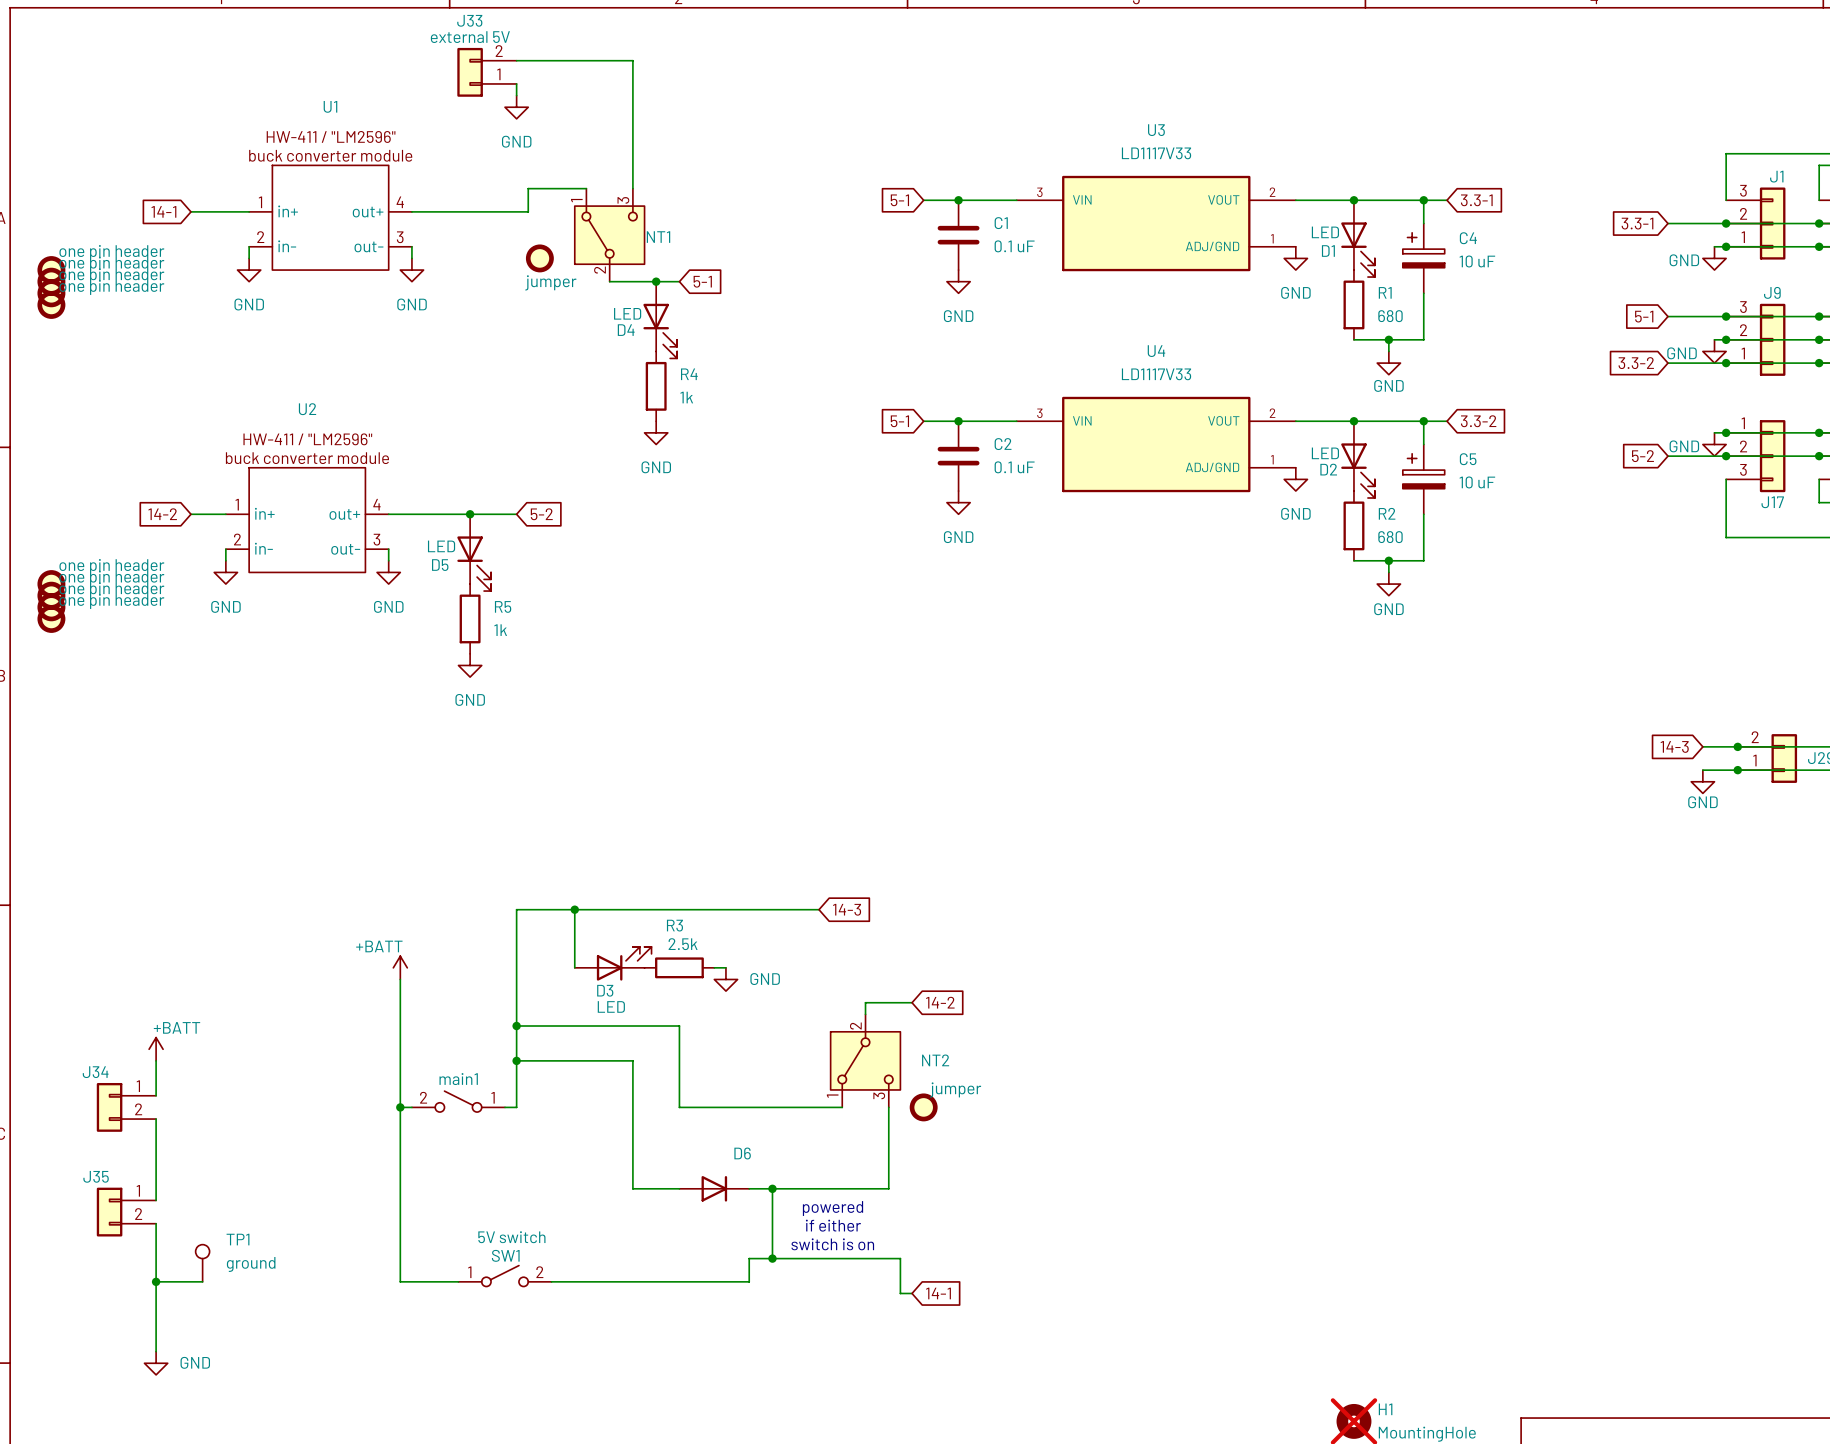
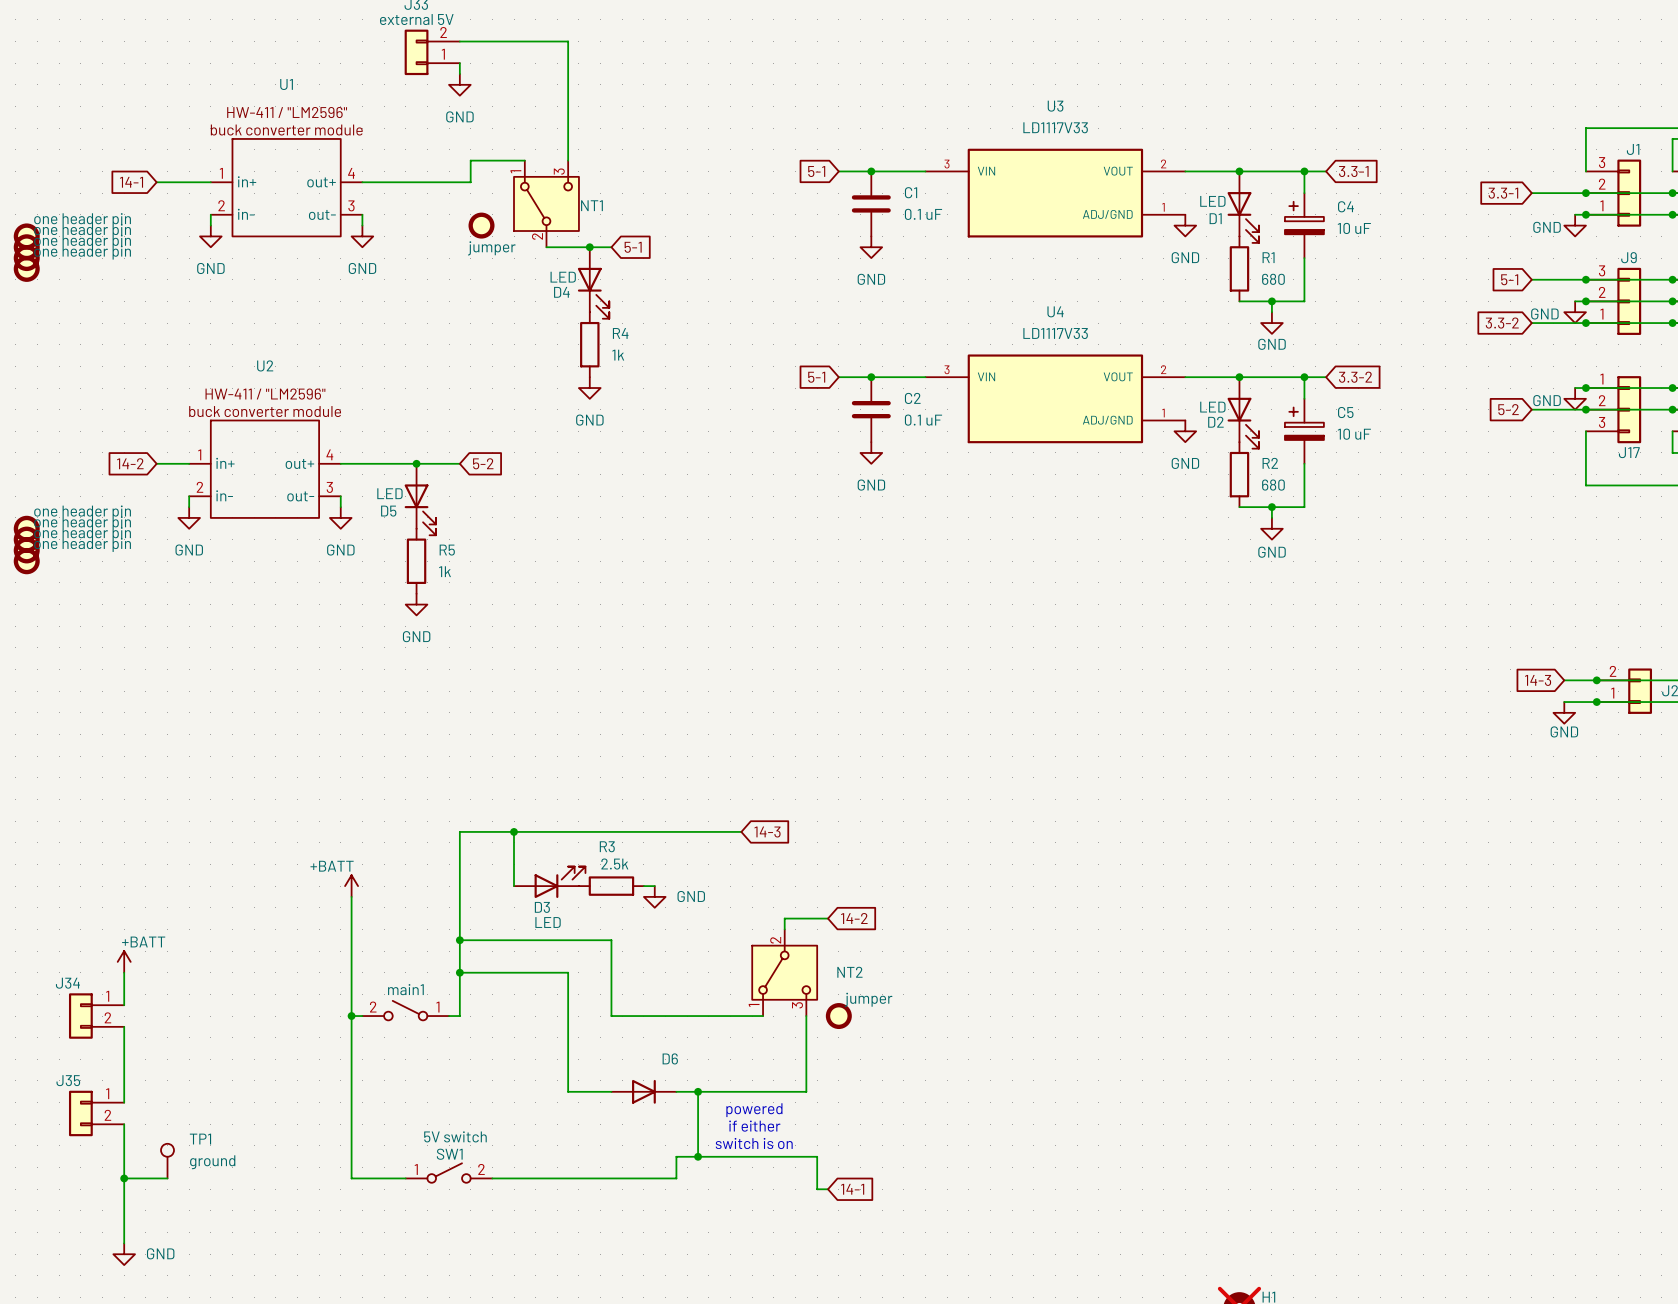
part value: one pin header (111, 252) -> one header pin (82, 220)
part value: one pin header (111, 264) -> one header pin (82, 230)
part value: one pin header (111, 275) -> one header pin (82, 241)
part value: one pin header (111, 287) -> one header pin (82, 252)
part value: one pin header (111, 566) -> one header pin (82, 512)
part value: one pin header (111, 578) -> one header pin (82, 523)
part value: one pin header (111, 589) -> one header pin (82, 534)
part value: one pin header (111, 601) -> one header pin (82, 544)

